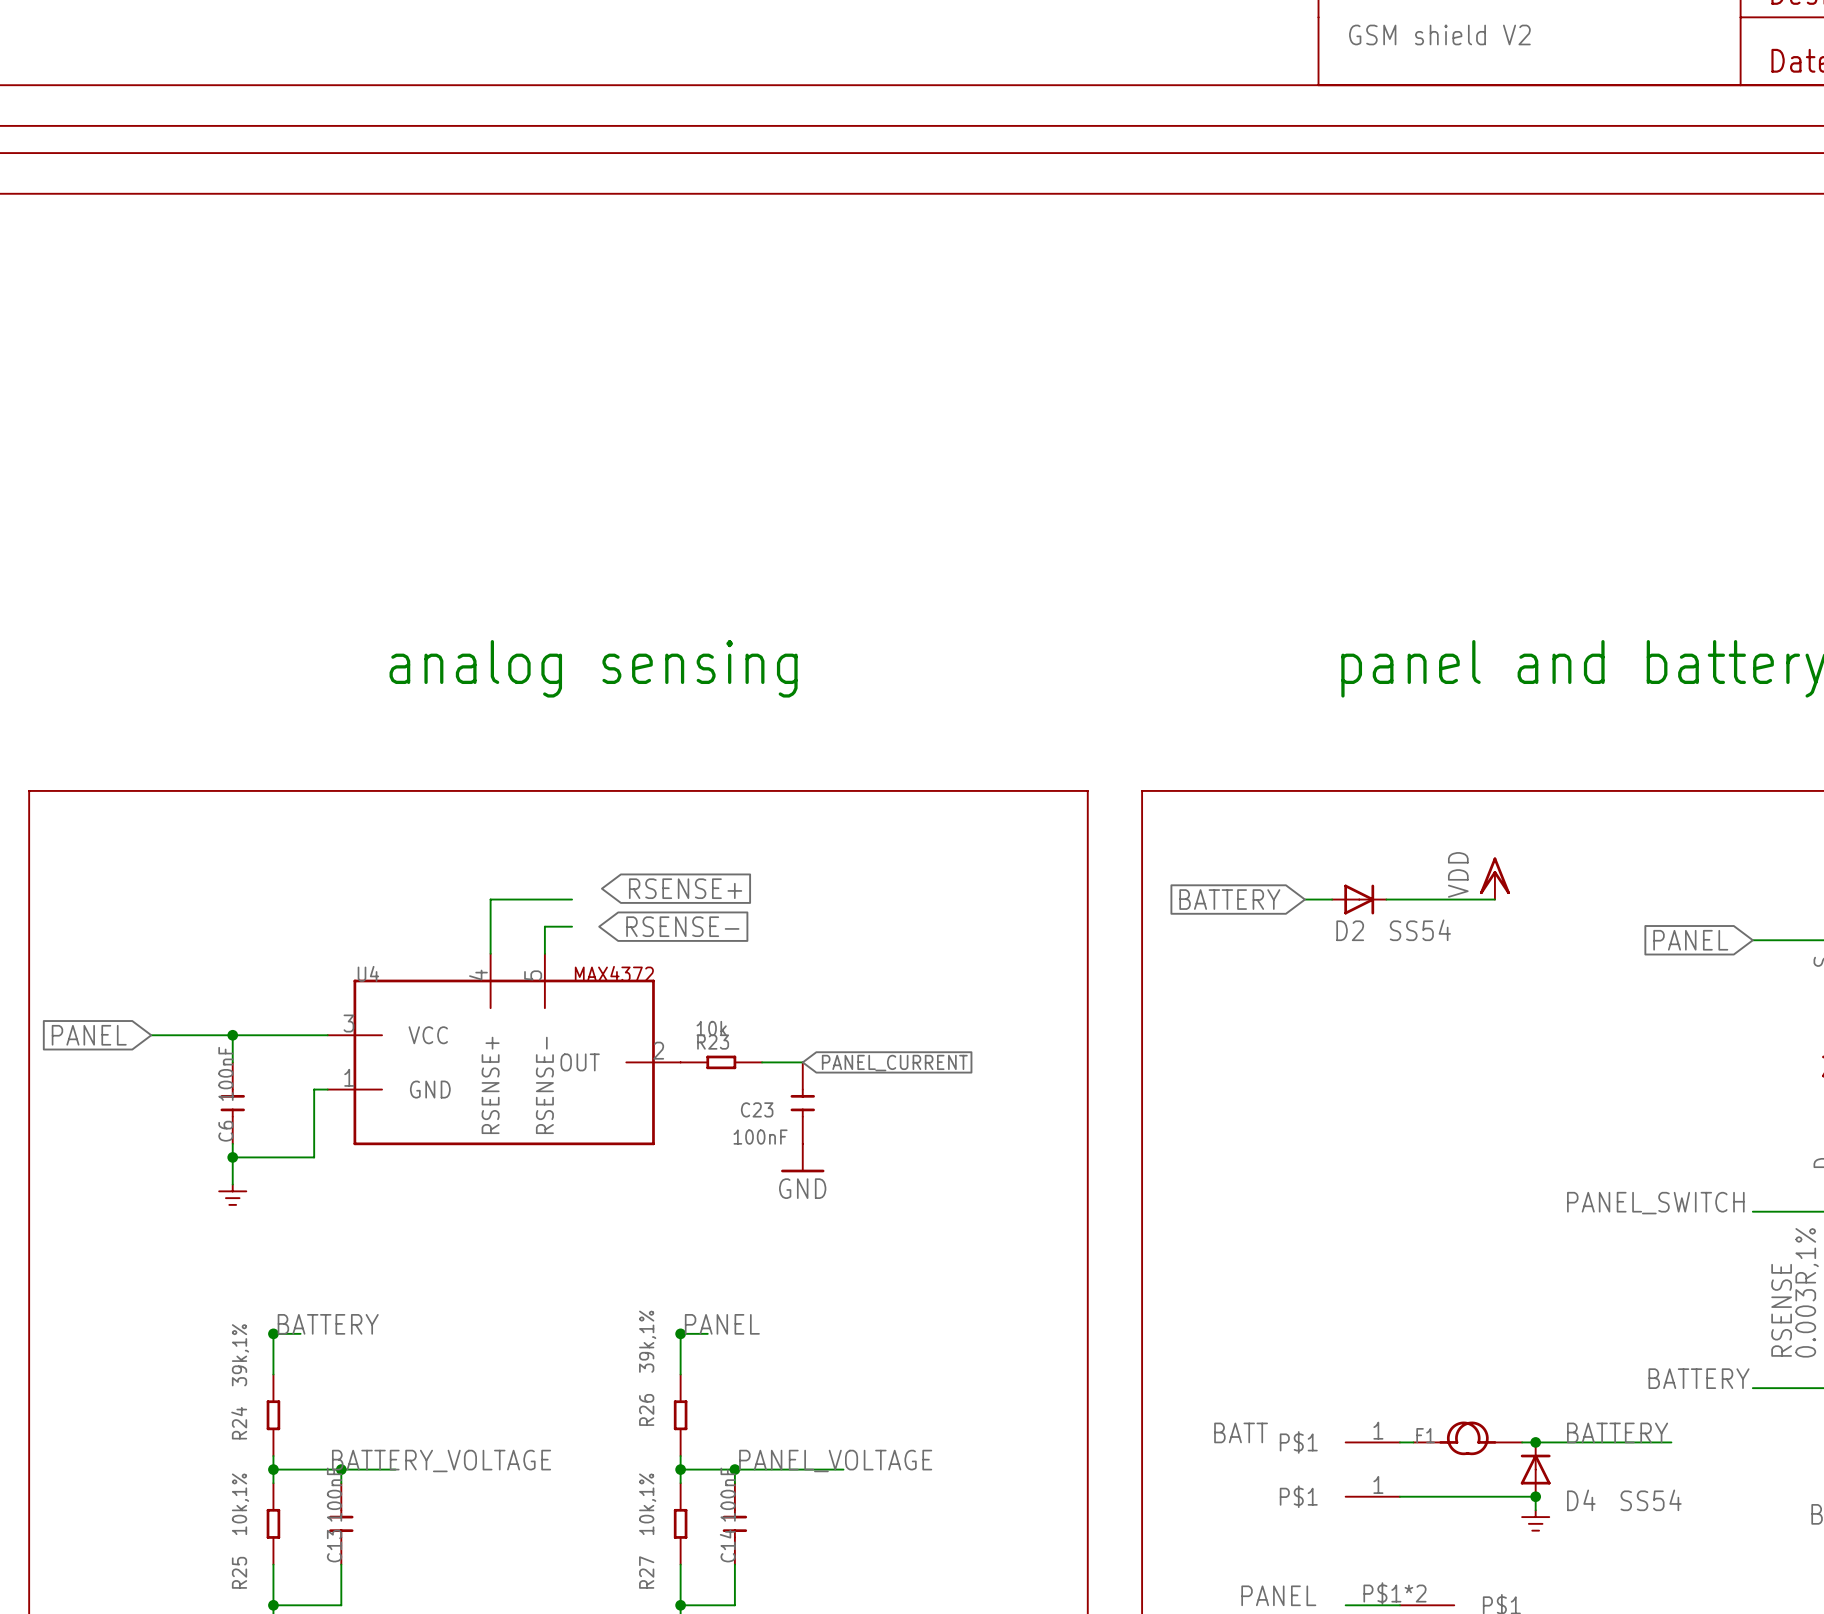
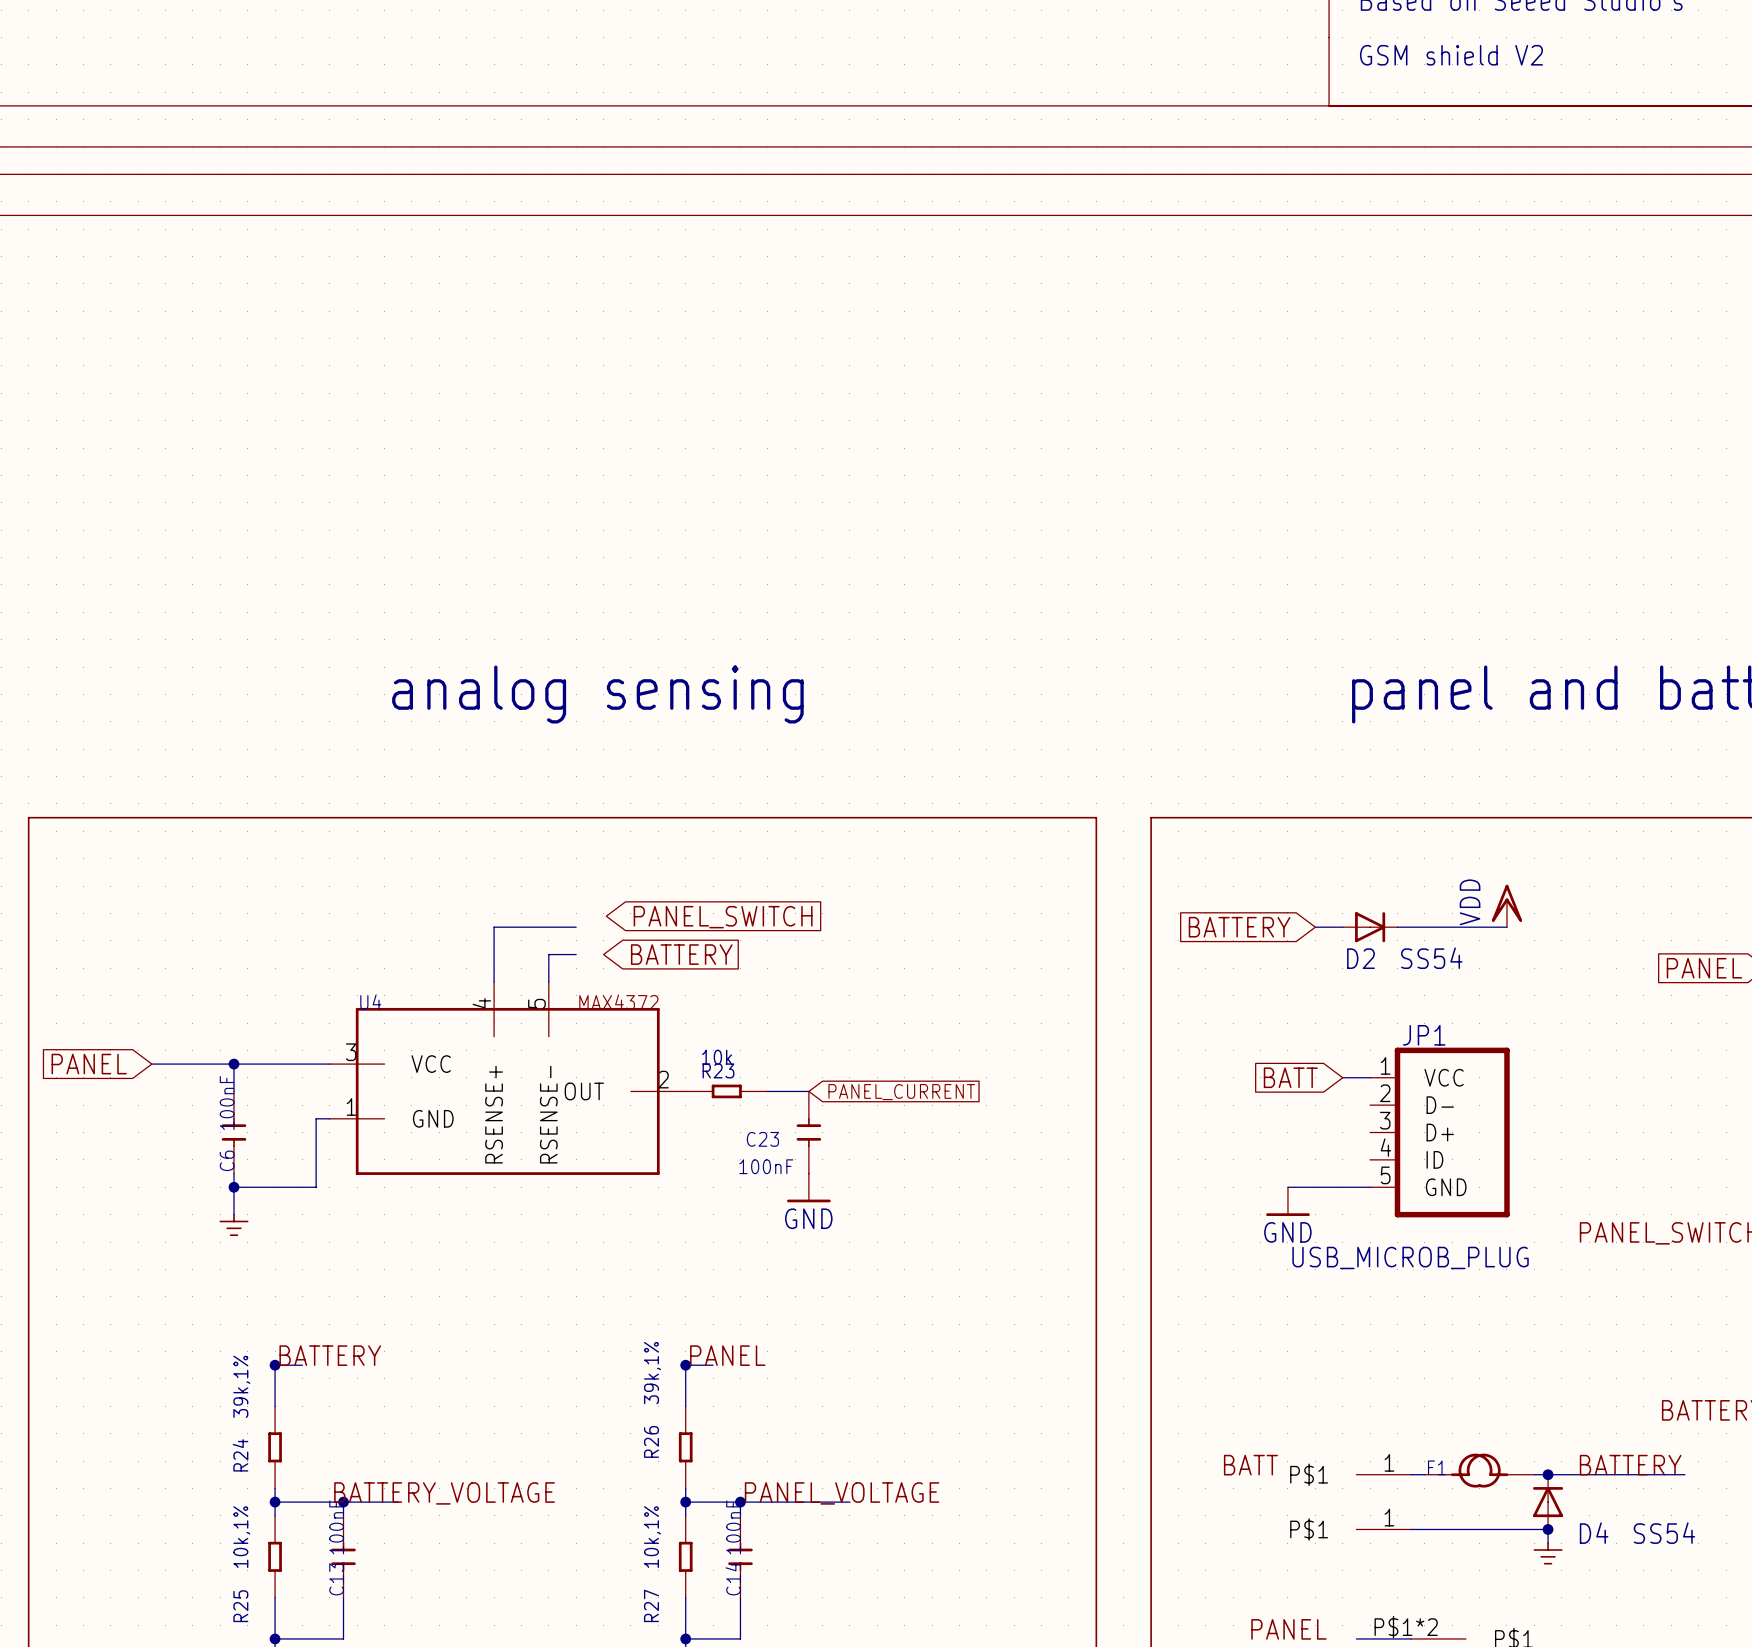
global label: RSENSE+ (685, 888) -> PANEL_SWITCH (723, 917)
global label: RSENSE- (682, 926) -> BATTERY (681, 954)
global label: none -> BATT (1290, 1077)
wire: none -> (1342, 1077) (1370, 1077)
JP1: none -> USB_MICROB_PLUG (1439, 1132)
wire: none -> (1287, 1187) (1370, 1187)
power symbol: none -> GND (1287, 1201)

